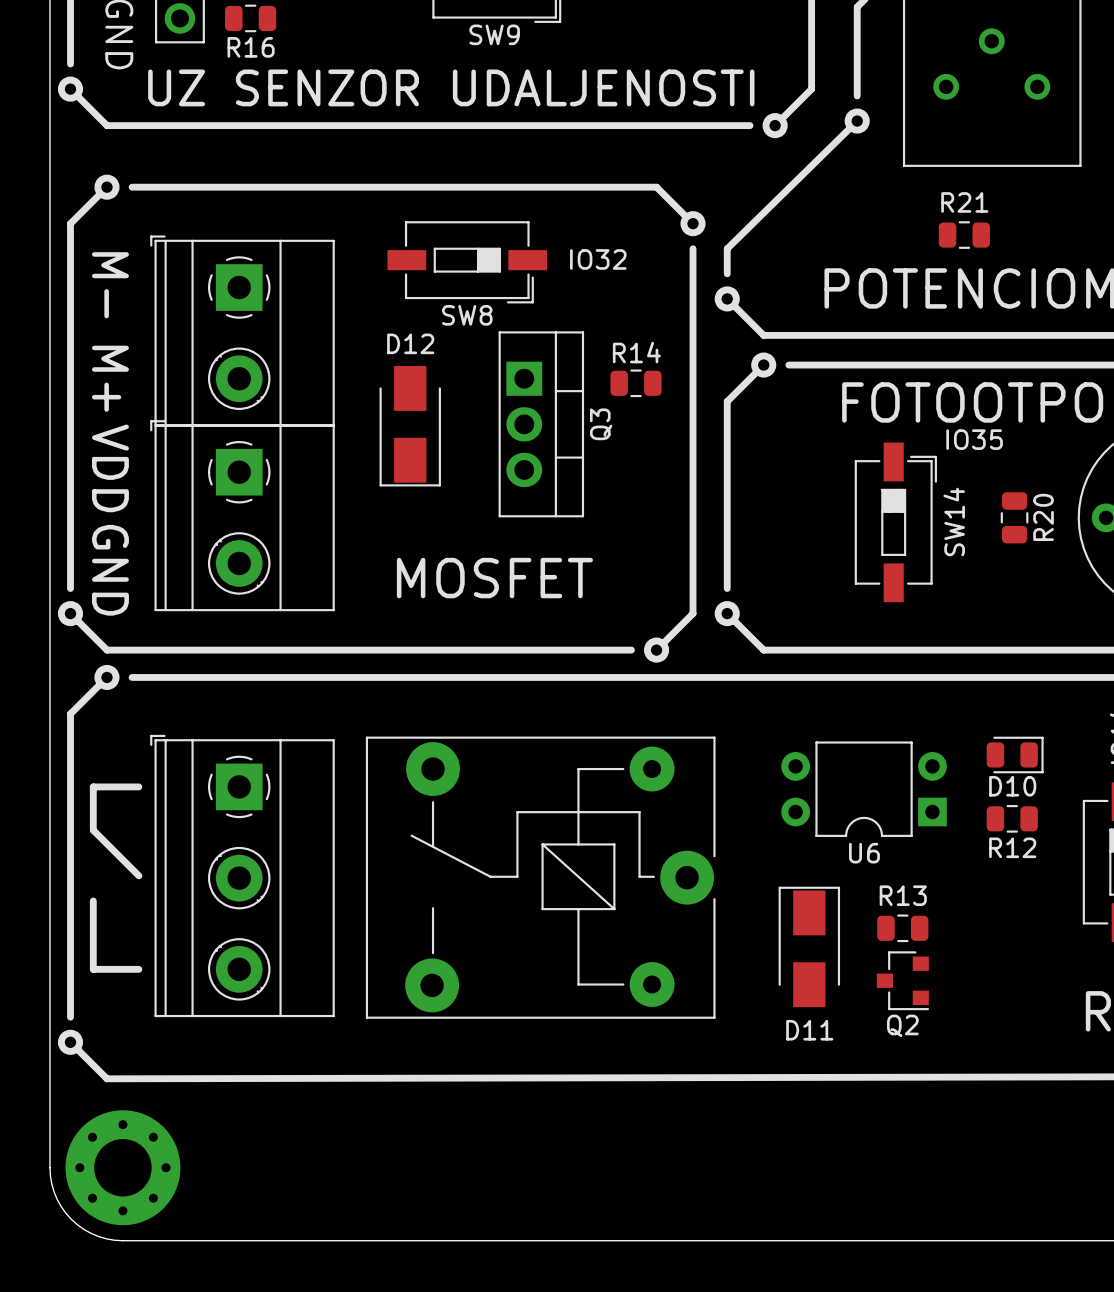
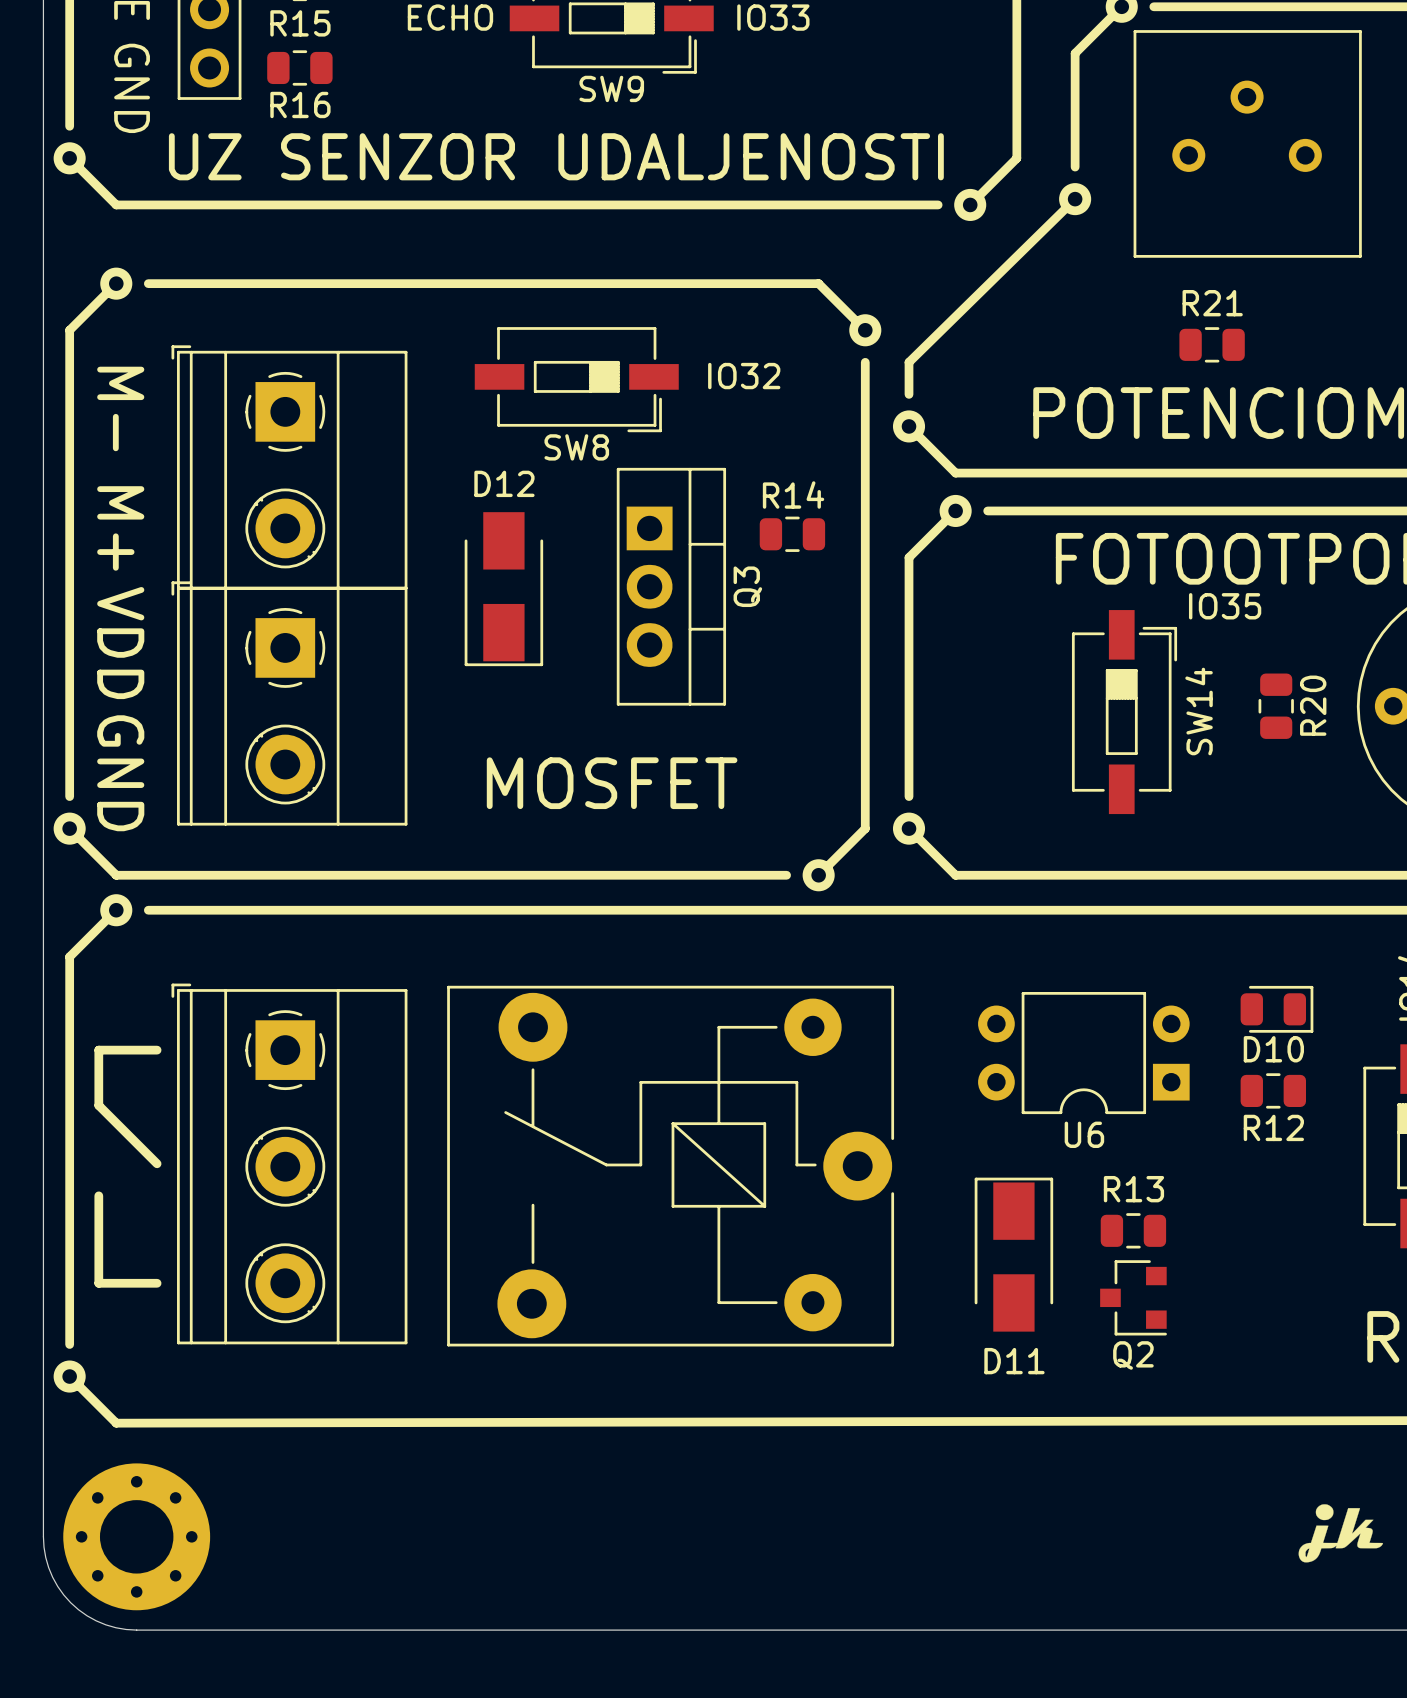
drawing: none -> [1298, 1504, 1384, 1563]

